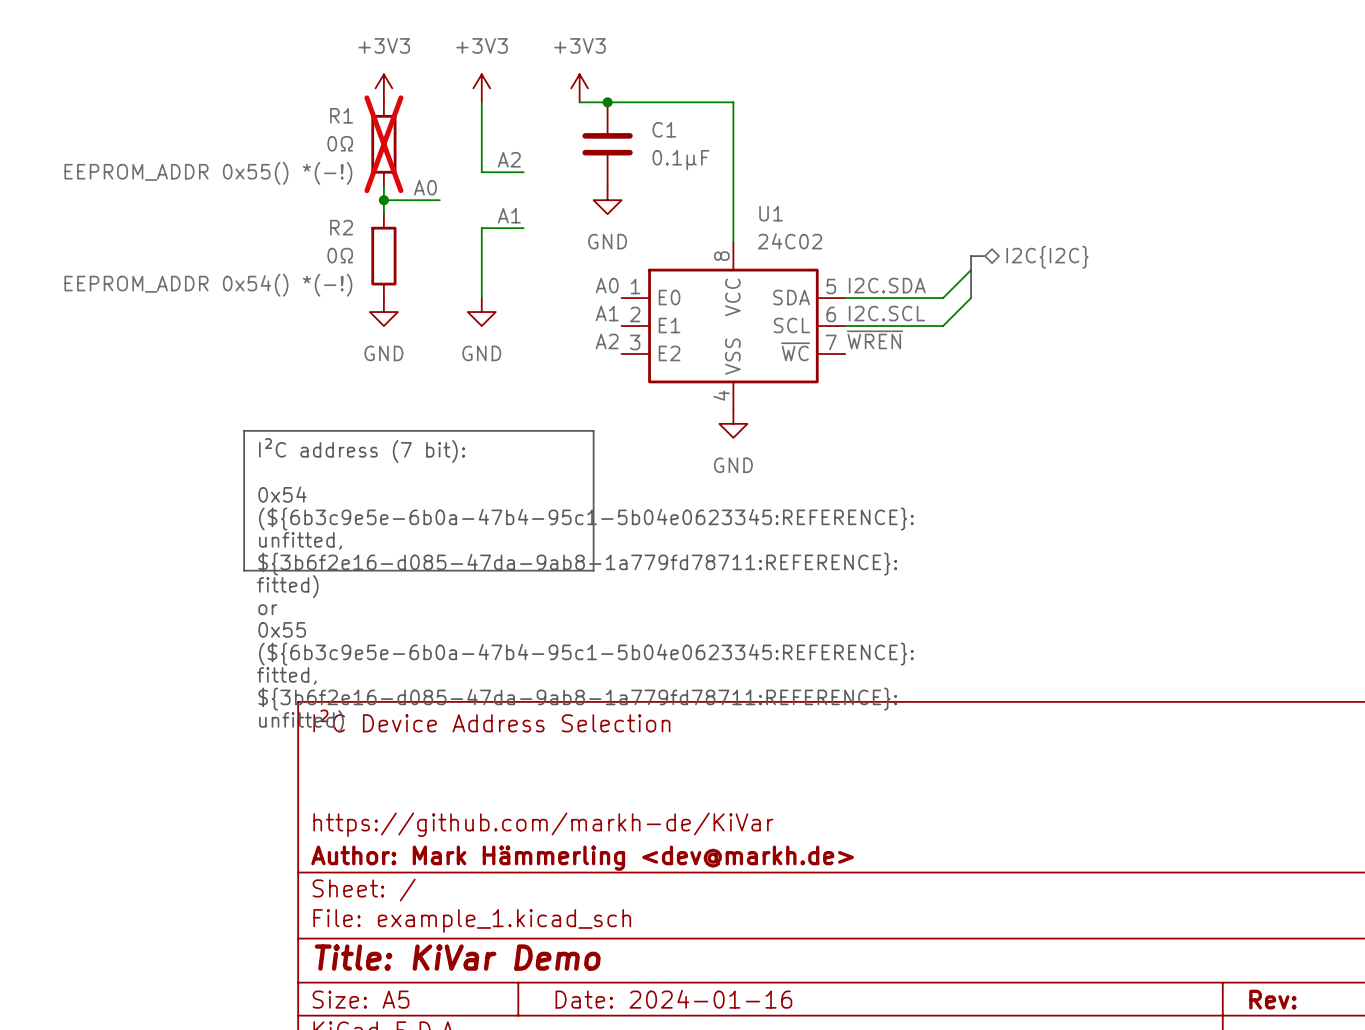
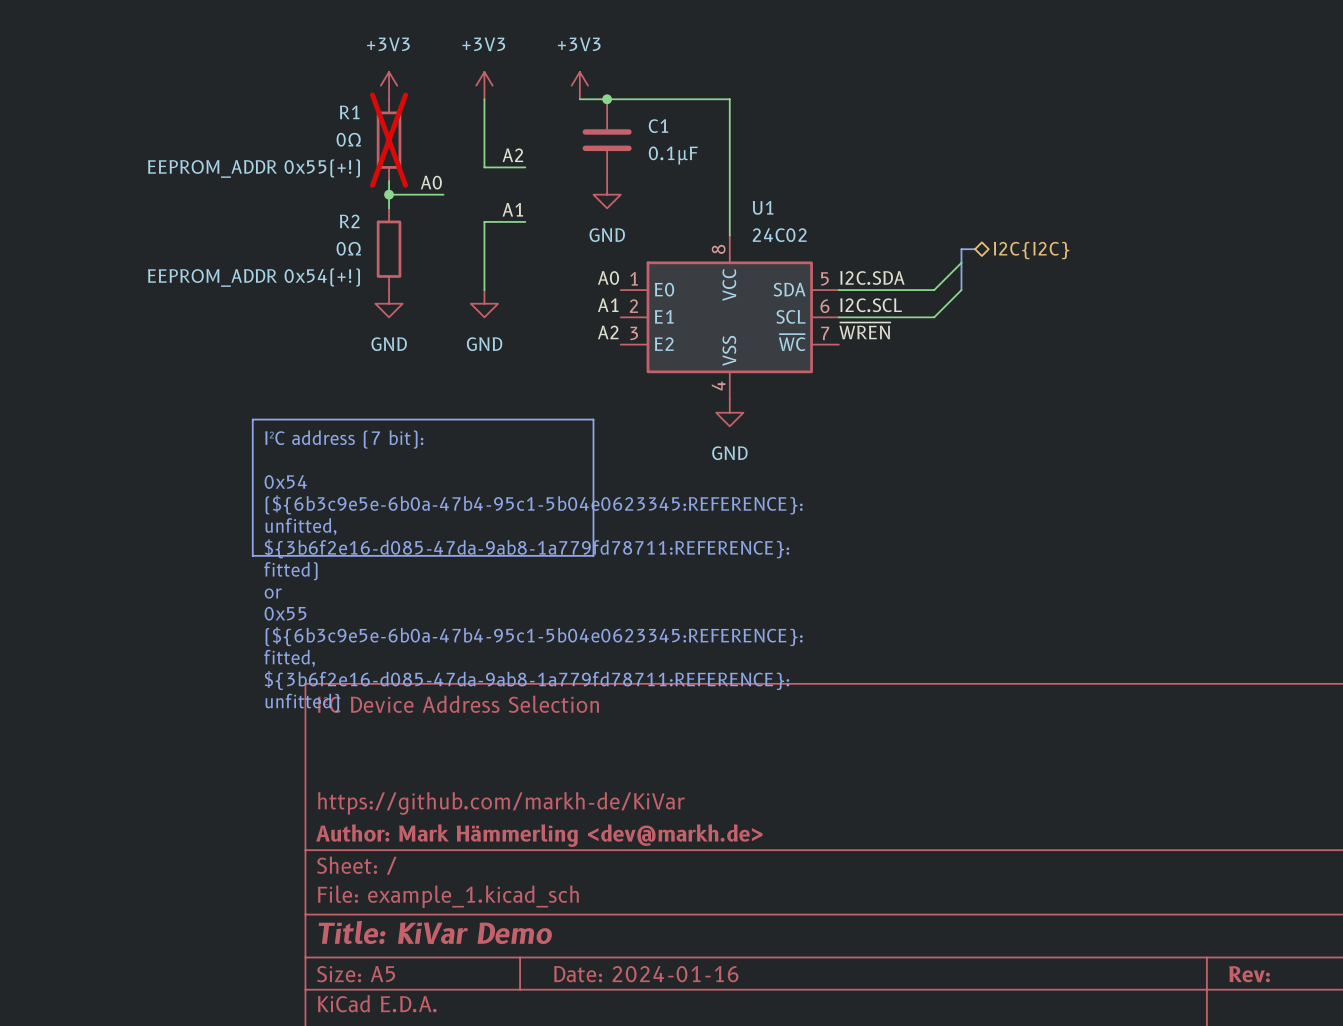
R1 text: EEPROM_ADDR 0x55() *(-!) (208, 173) -> EEPROM_ADDR 0x55(+!) (254, 168)
R2 text: EEPROM_ADDR 0x54() *(-!) (208, 285) -> EEPROM_ADDR 0x54(+!) (254, 277)

